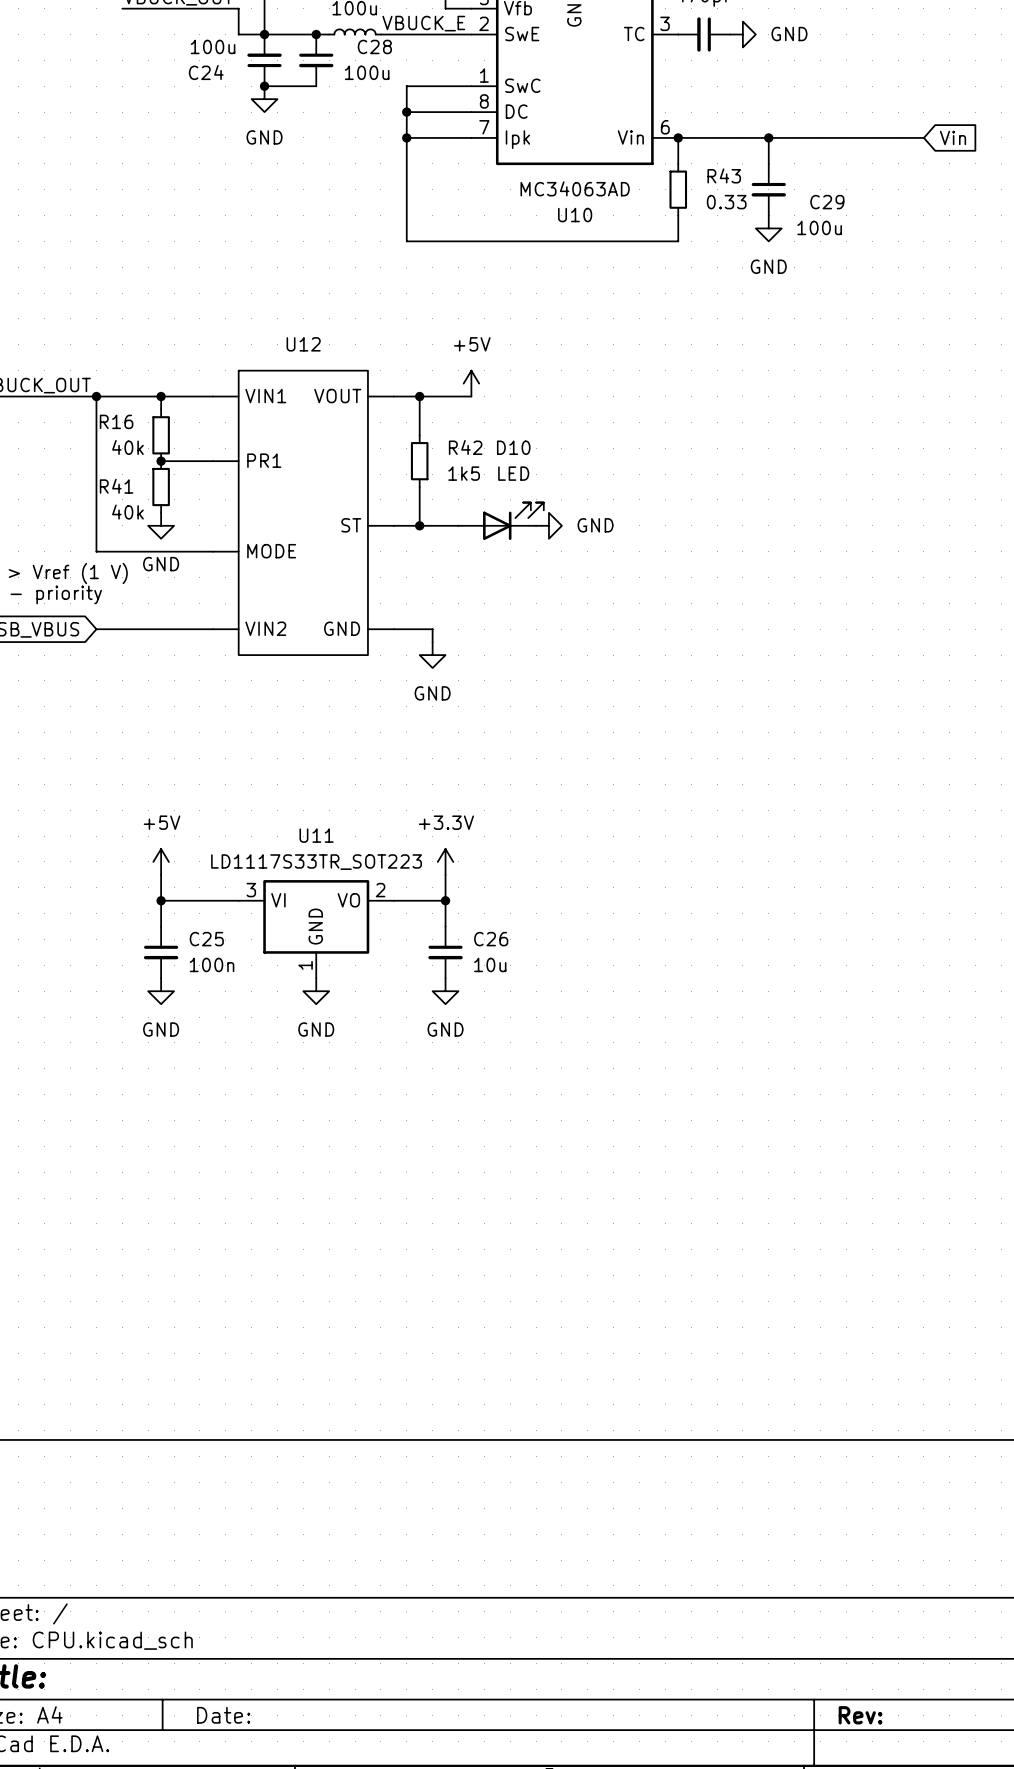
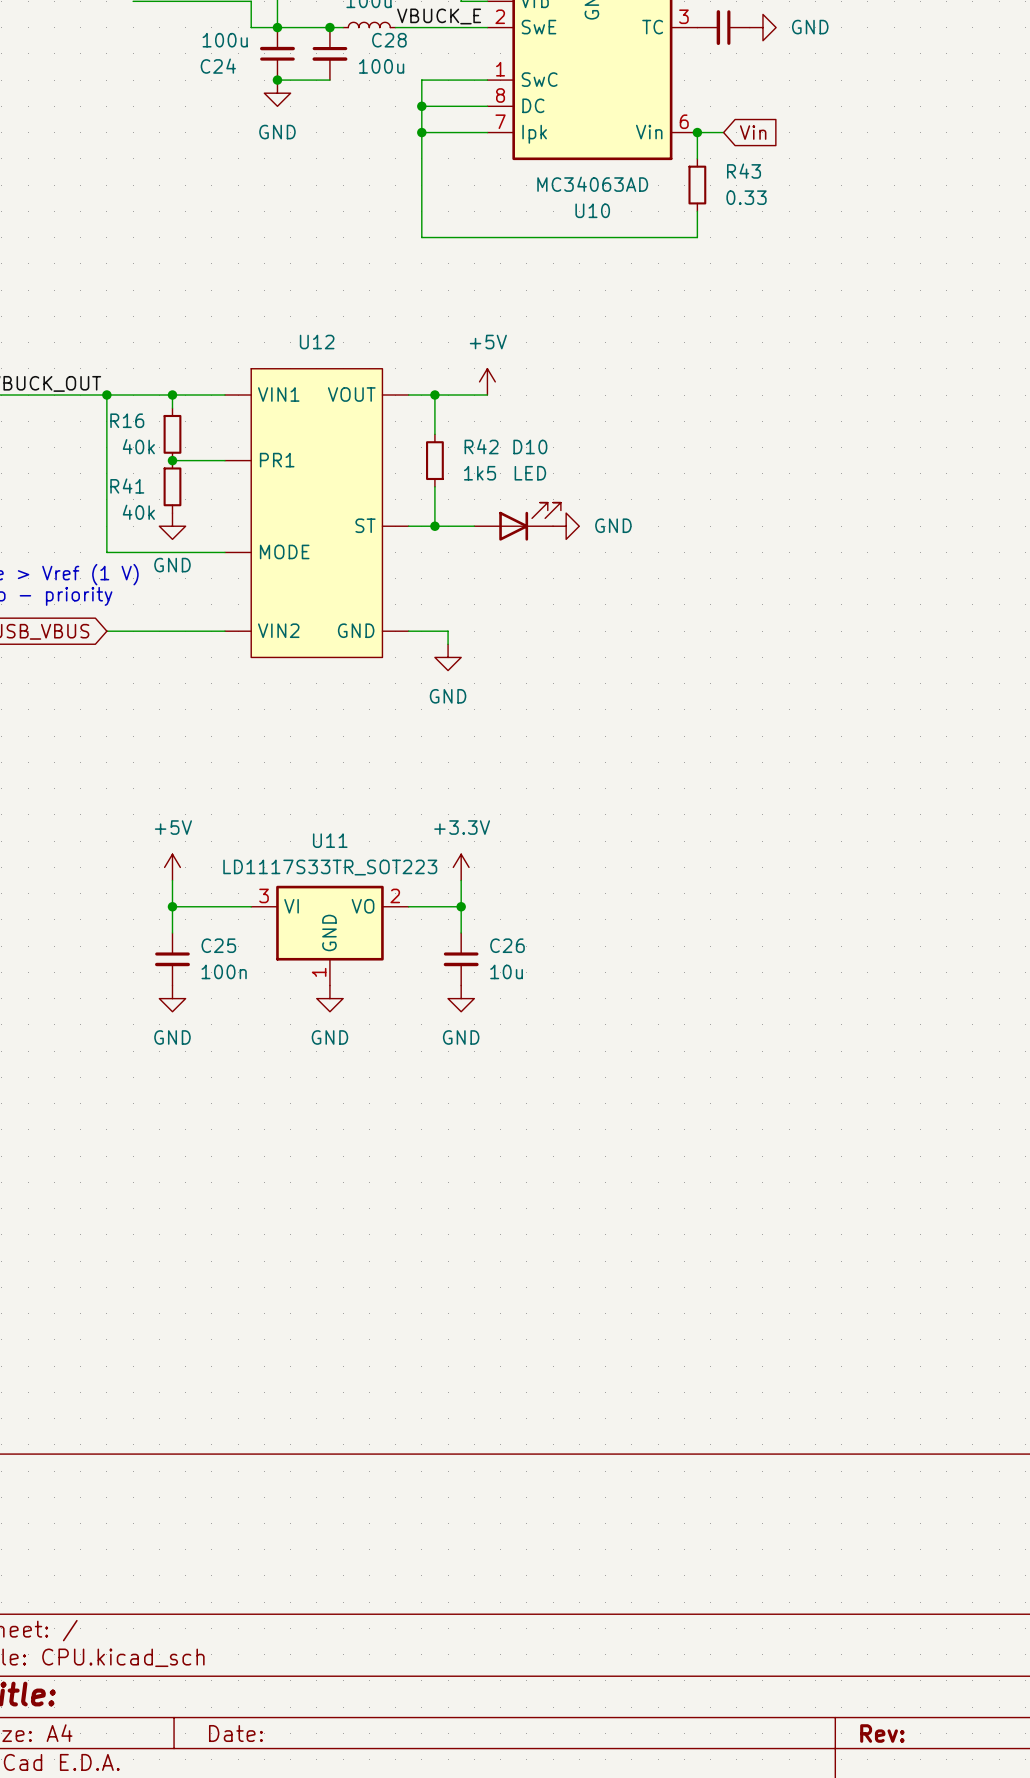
wire: (704, 137) (923, 137) -> none
wire: (768, 137) (768, 163) -> none
junction: (768, 137) -> none
global label position: Vin (953, 137) -> Vin (753, 132)
C29: 100u (768, 189) -> none
power symbol: GND (768, 228) -> none

